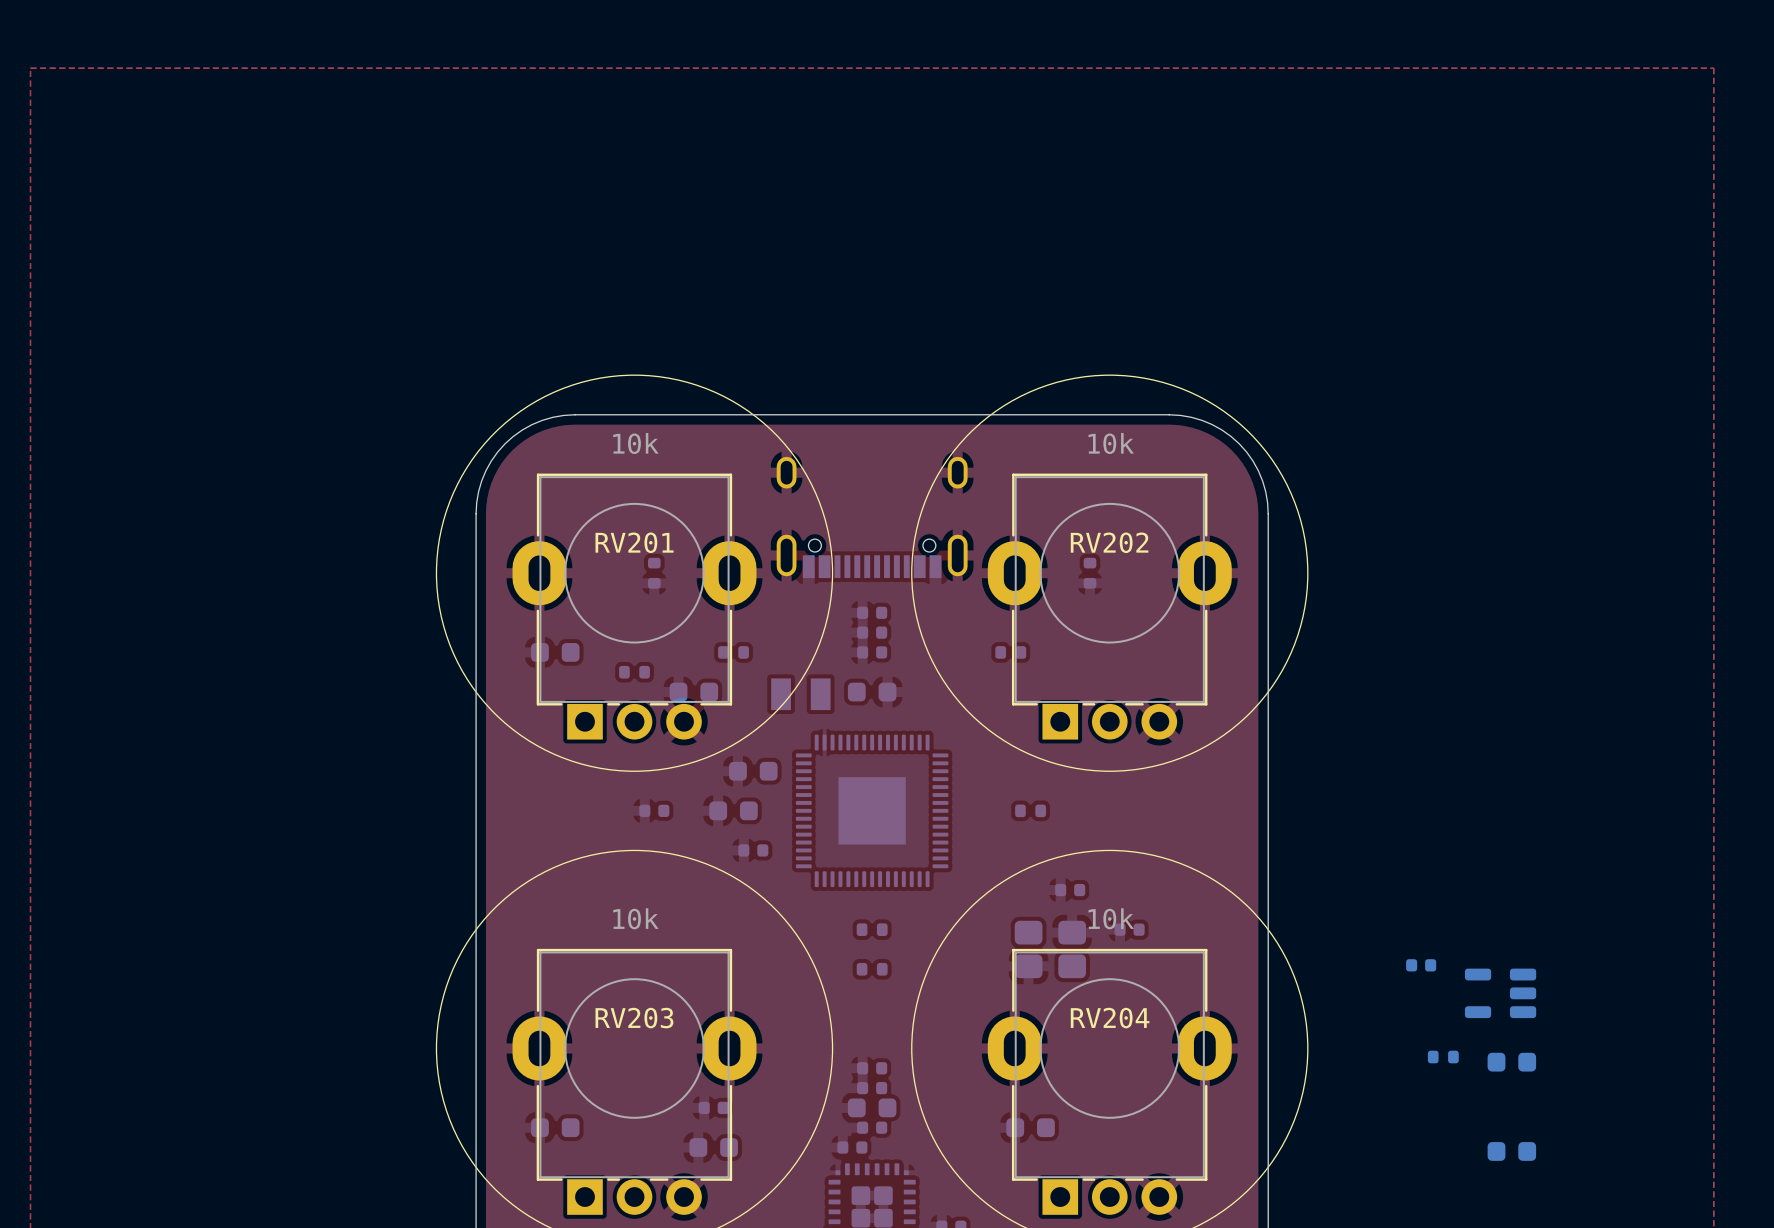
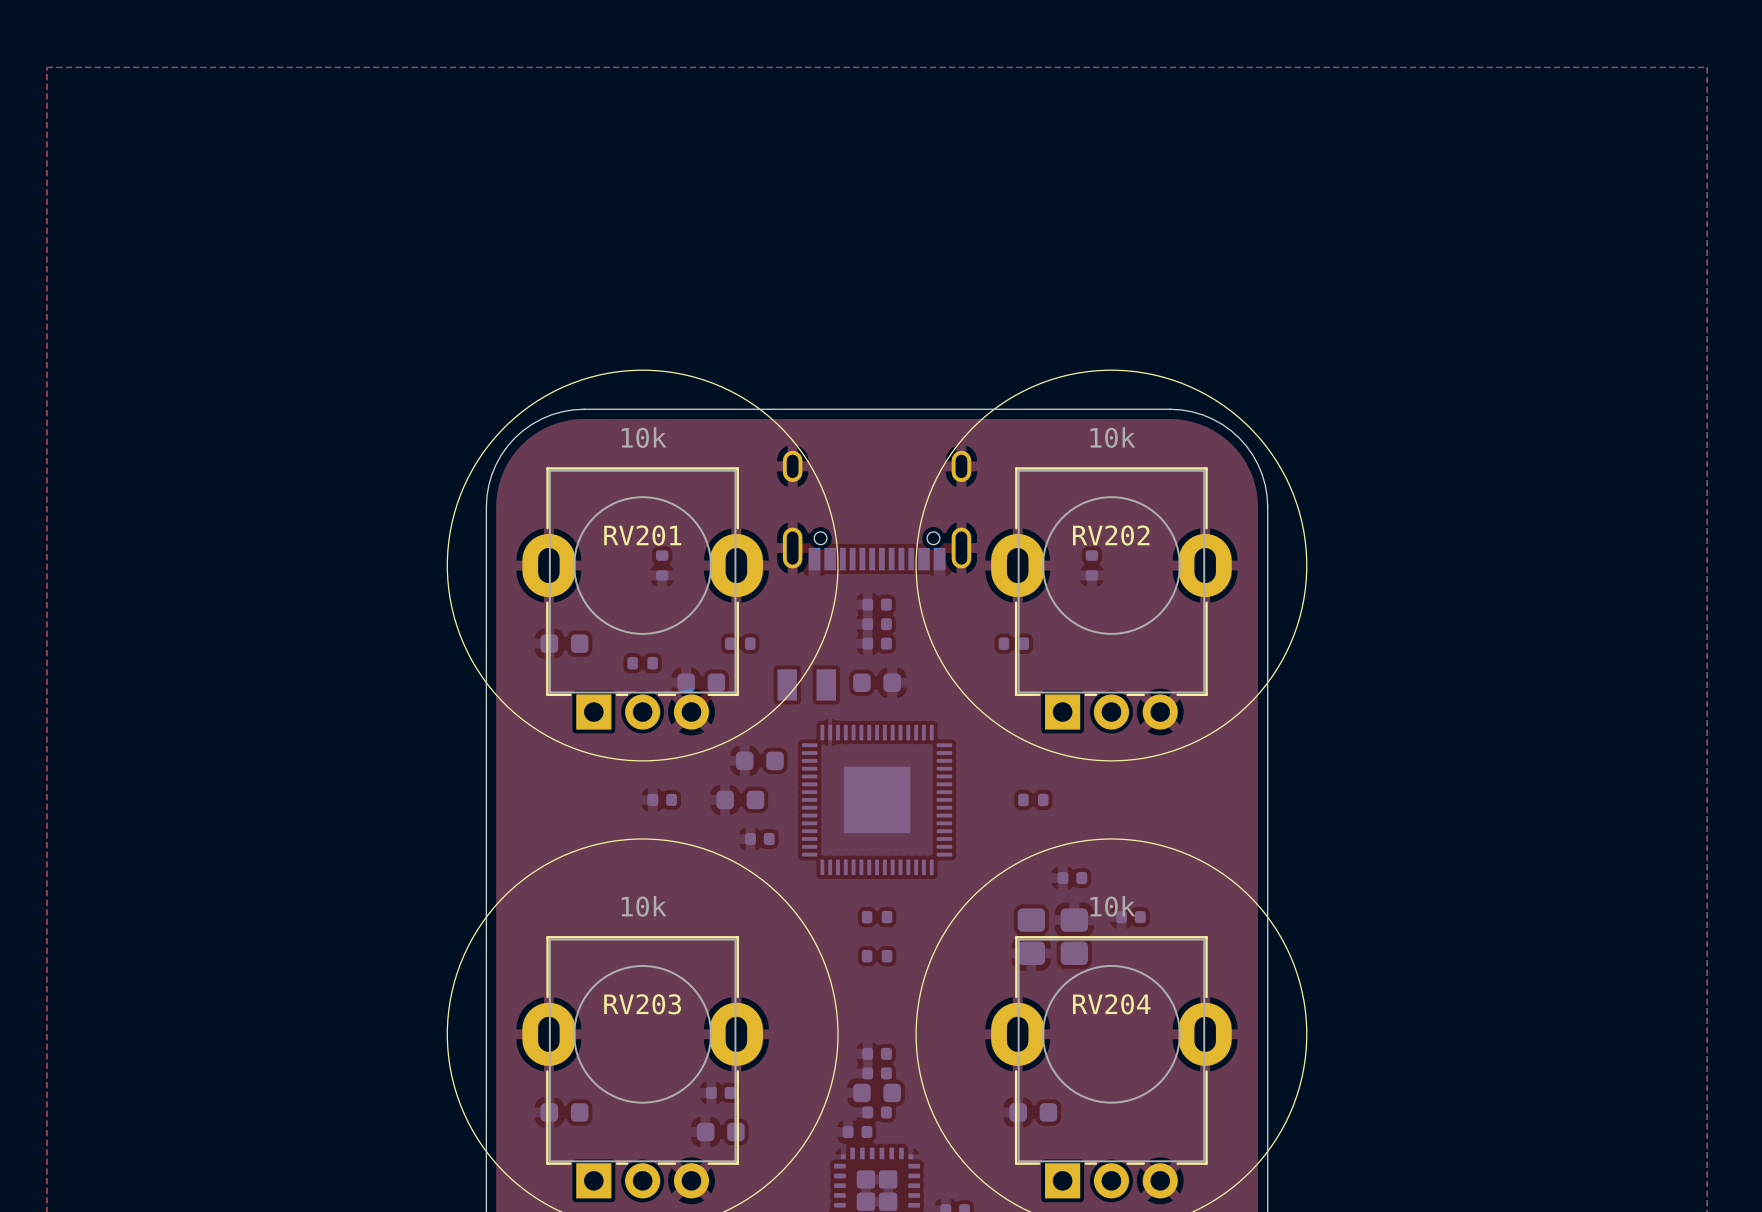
part: (1421, 965) -> none
part: (1500, 993) -> none
part: (1443, 1057) -> none
part: (1511, 1062) -> none
part: (1511, 1151) -> none

